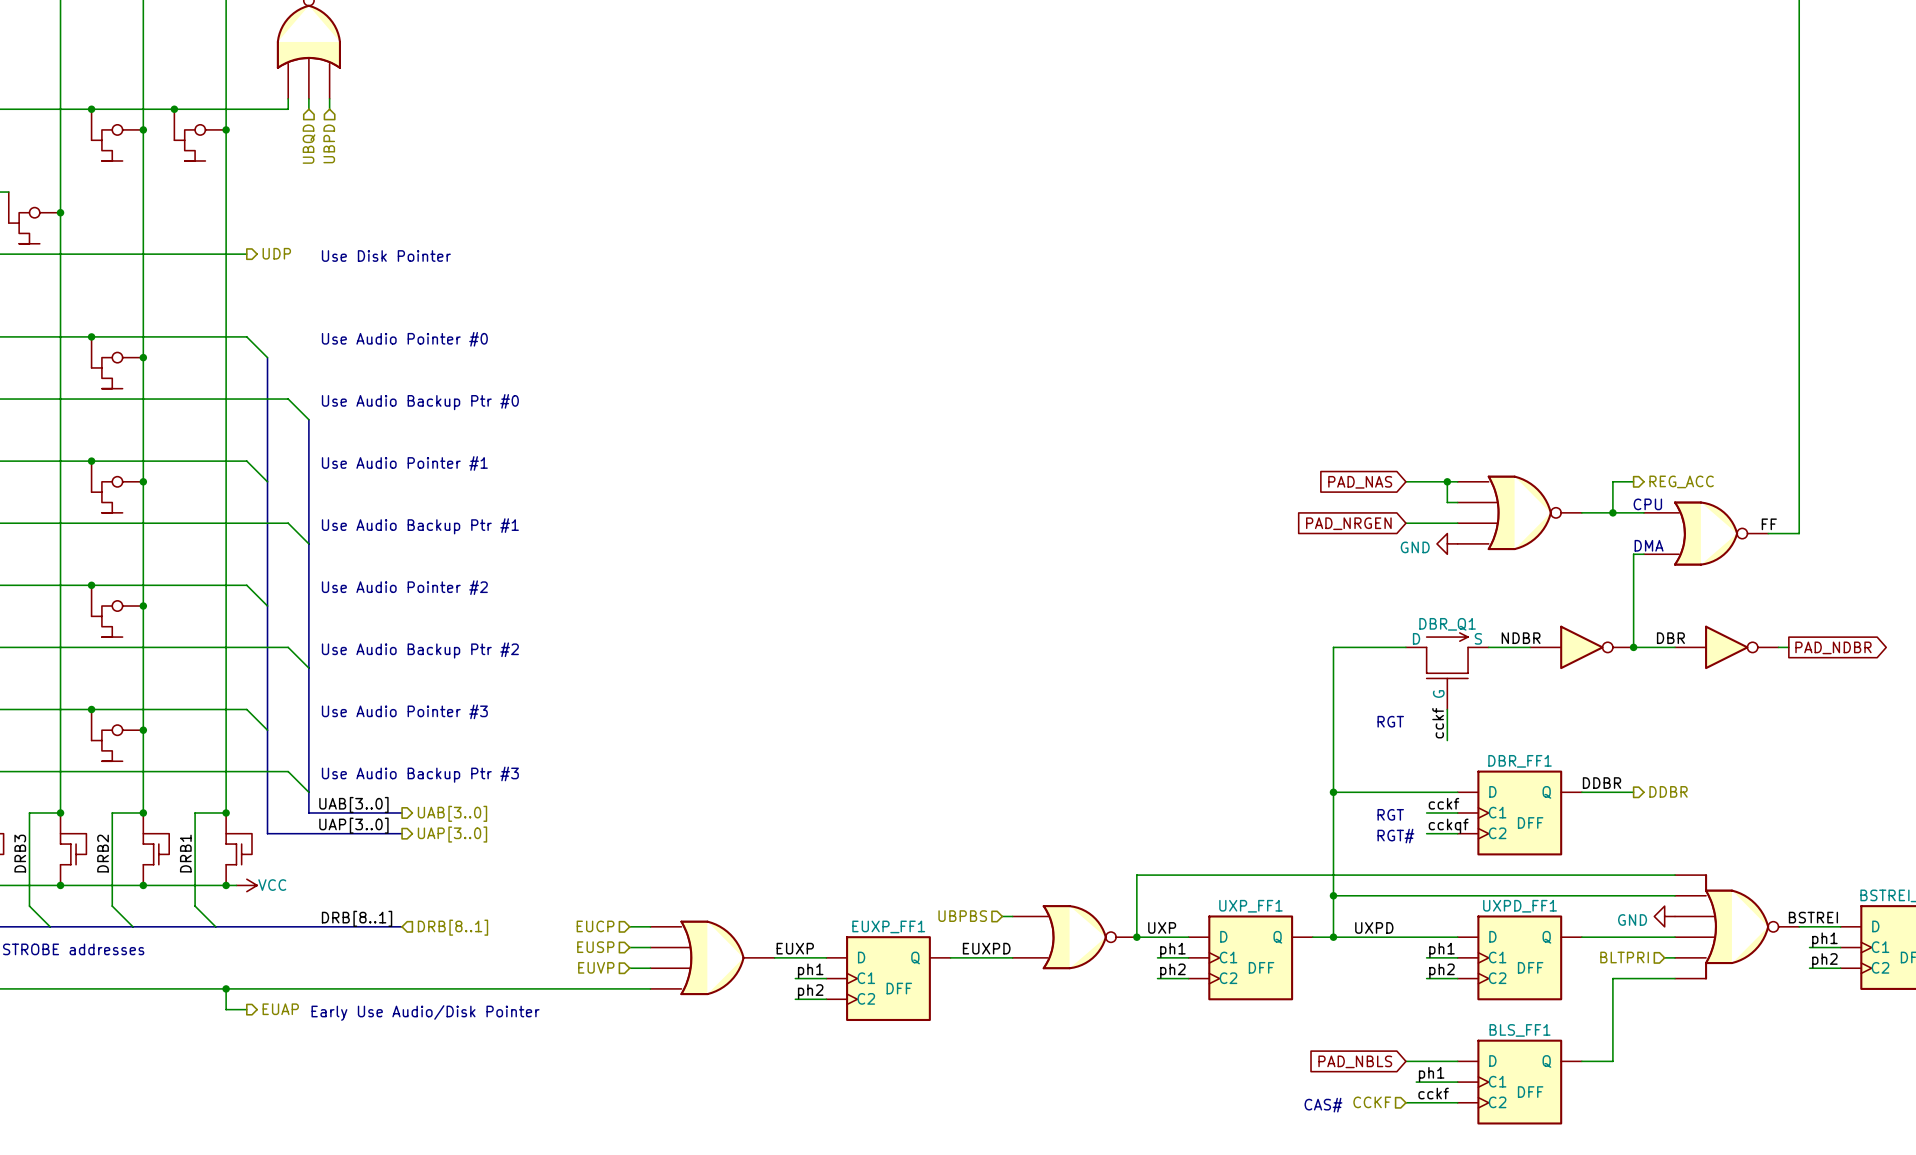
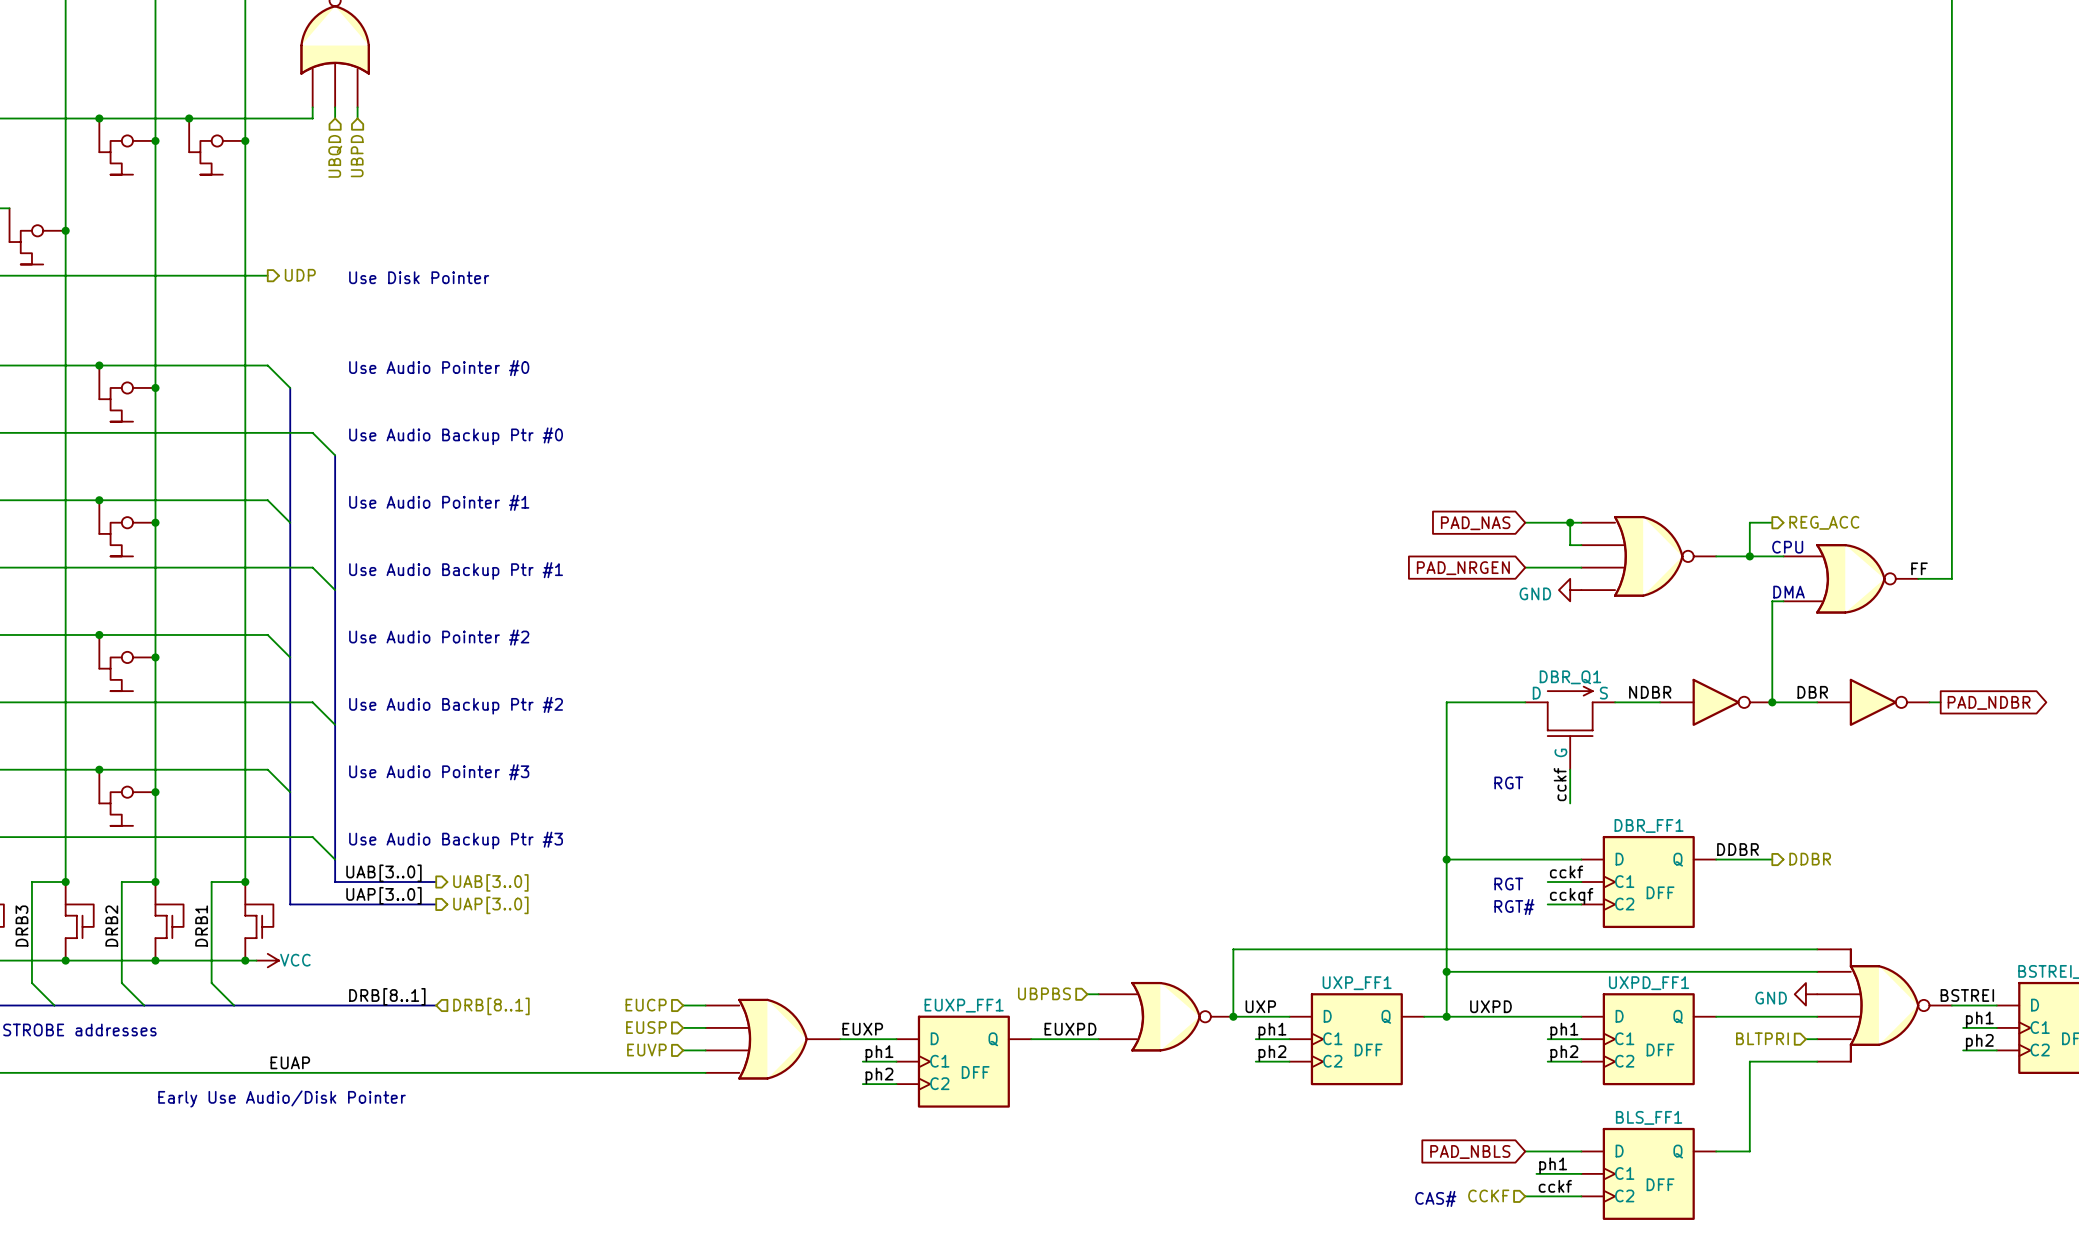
label: none -> EUAP (290, 1062)
wire: (226, 988) (226, 1009) (246, 1009) -> none
junction: (226, 988) -> none
hierarchical label: EUAP (280, 1009) -> none
text position: Early Use Audio/Disk Pointer (425, 1012) -> Early Use Audio/Disk Pointer (282, 1098)

